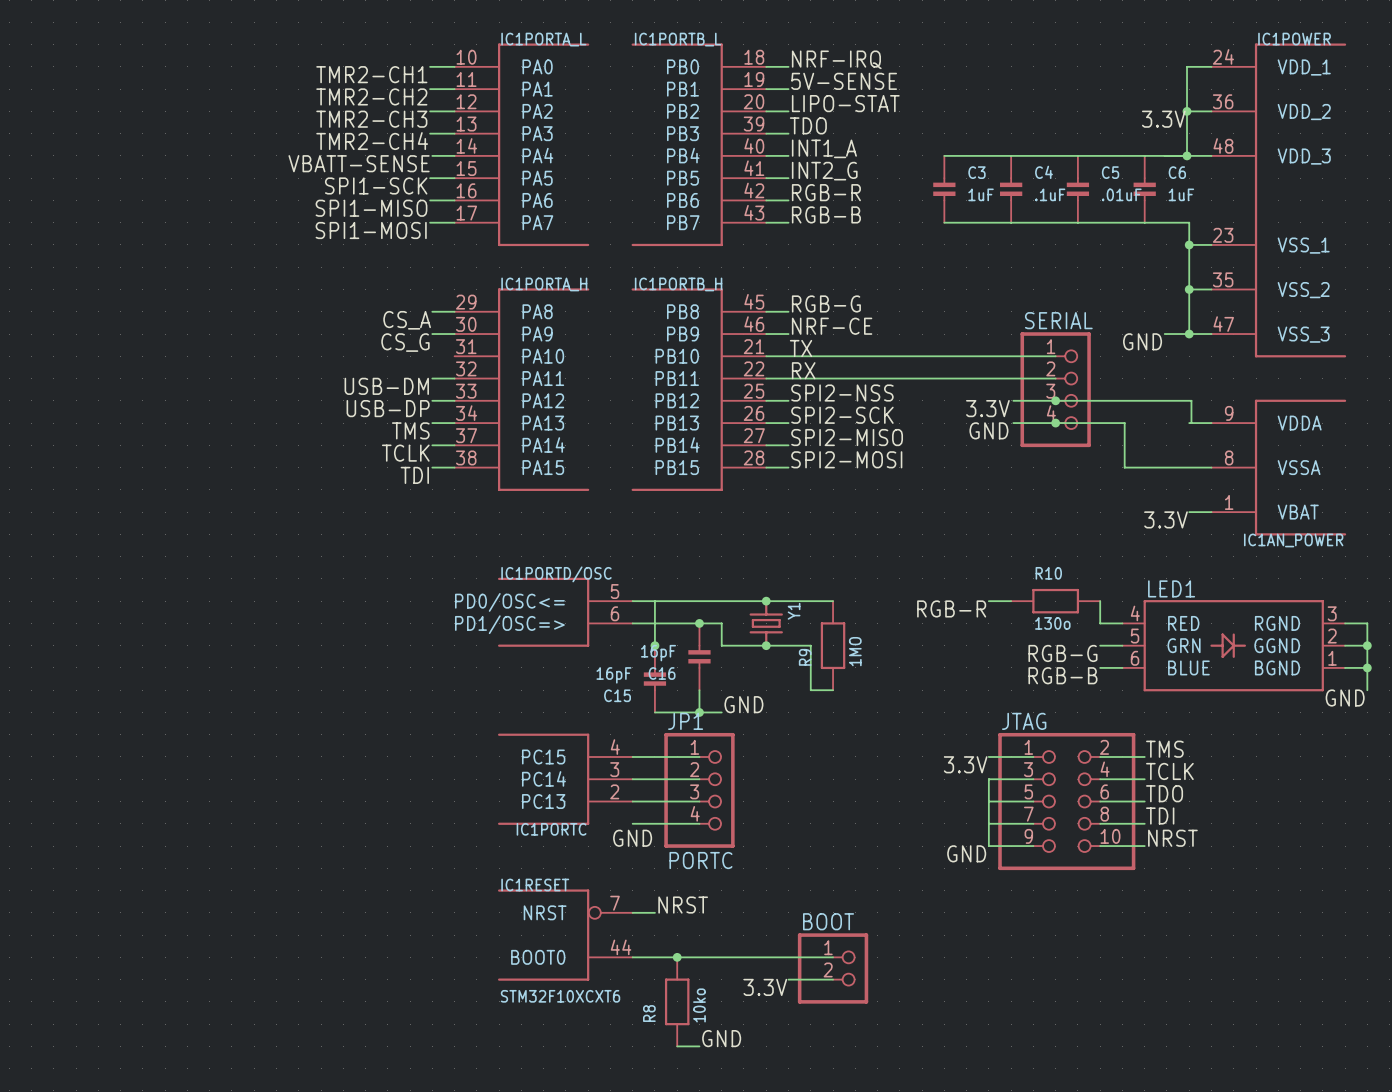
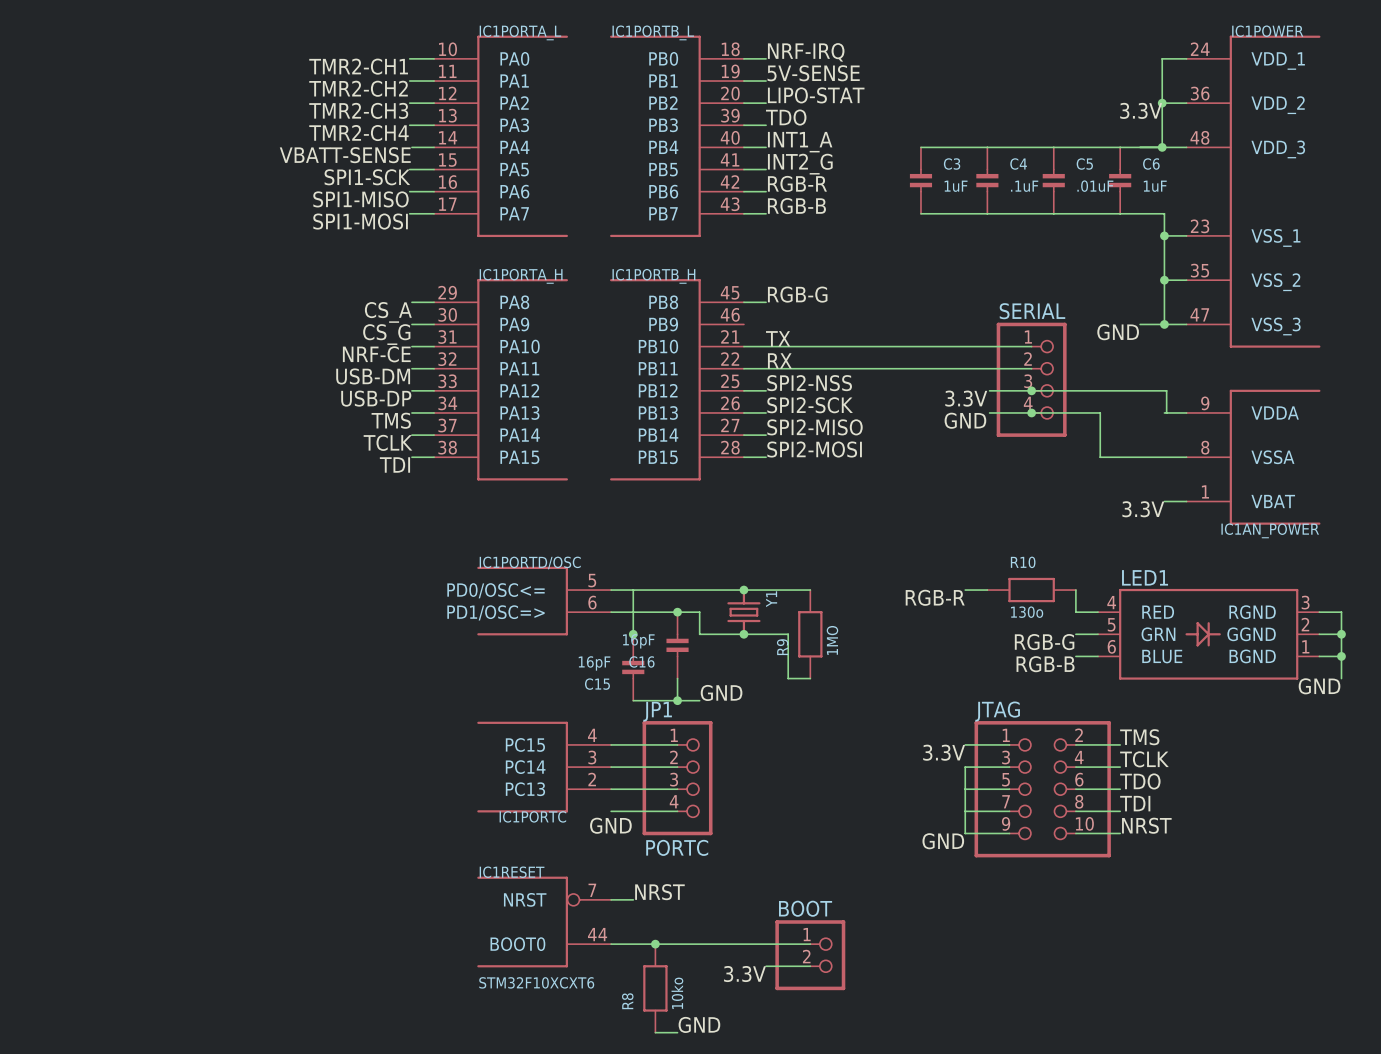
label: NRF-CE (832, 326) -> none
wire: (766, 334) (788, 334) -> none
wire: none -> (411, 346) (434, 346)
label: none -> NRF-CE (376, 354)

